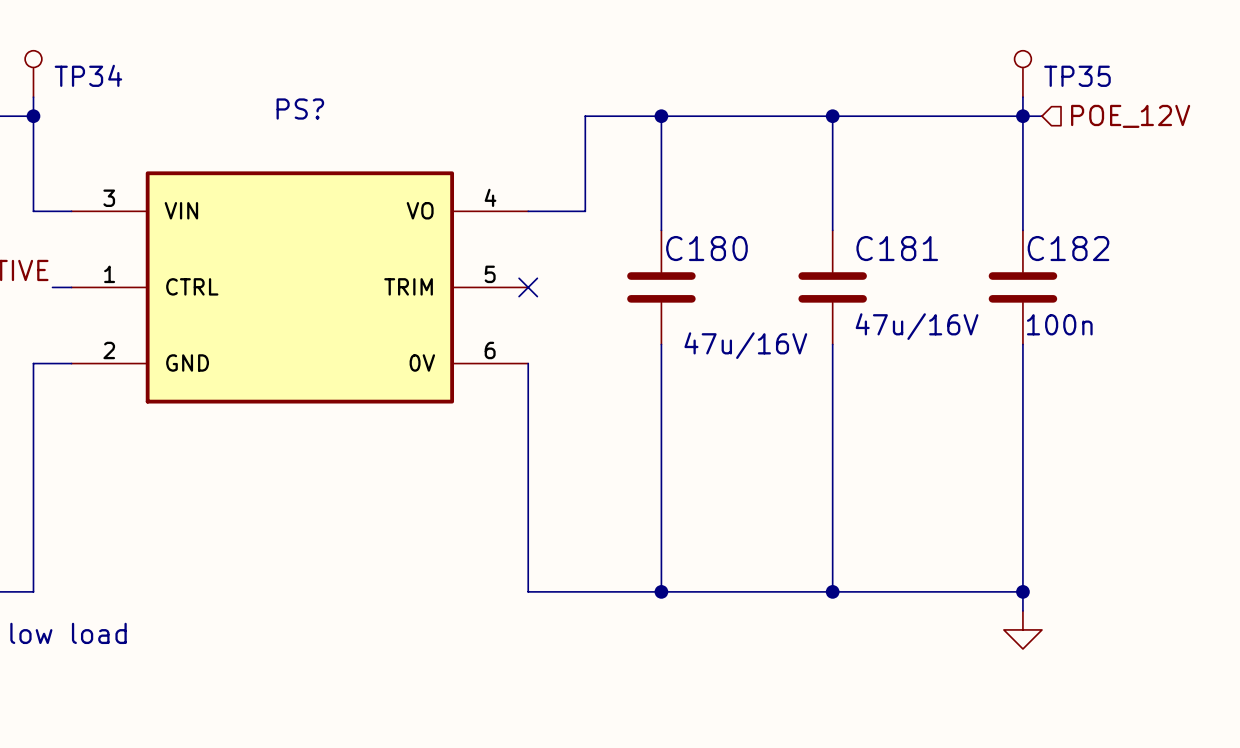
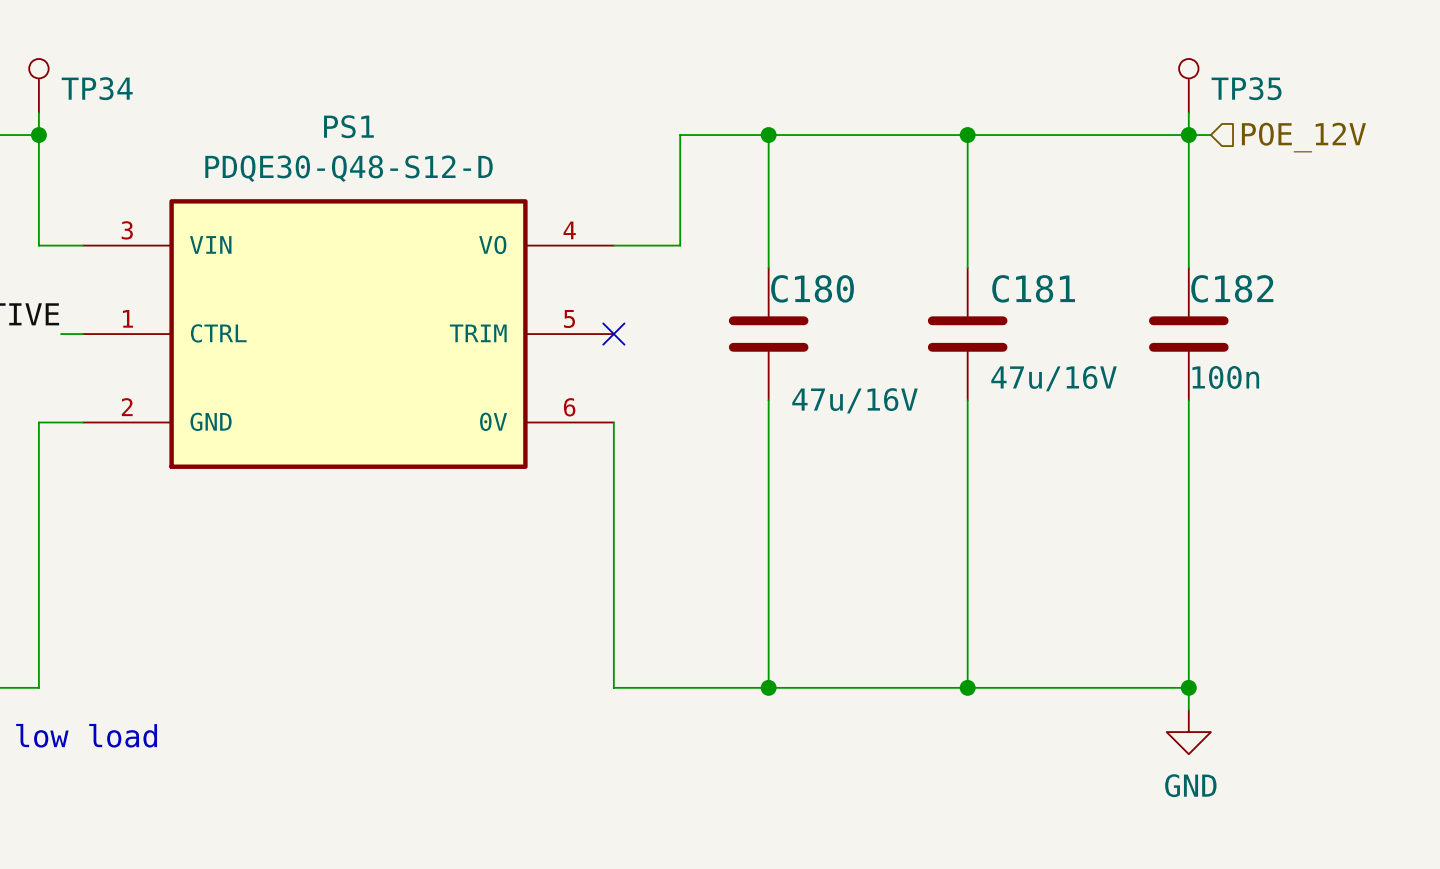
PS? name: PS? (300, 109) -> PS1 (348, 126)
PS? value: none -> PDQE30-Q48-S12-D (349, 168)
power symbol text: none -> GND (1190, 785)

